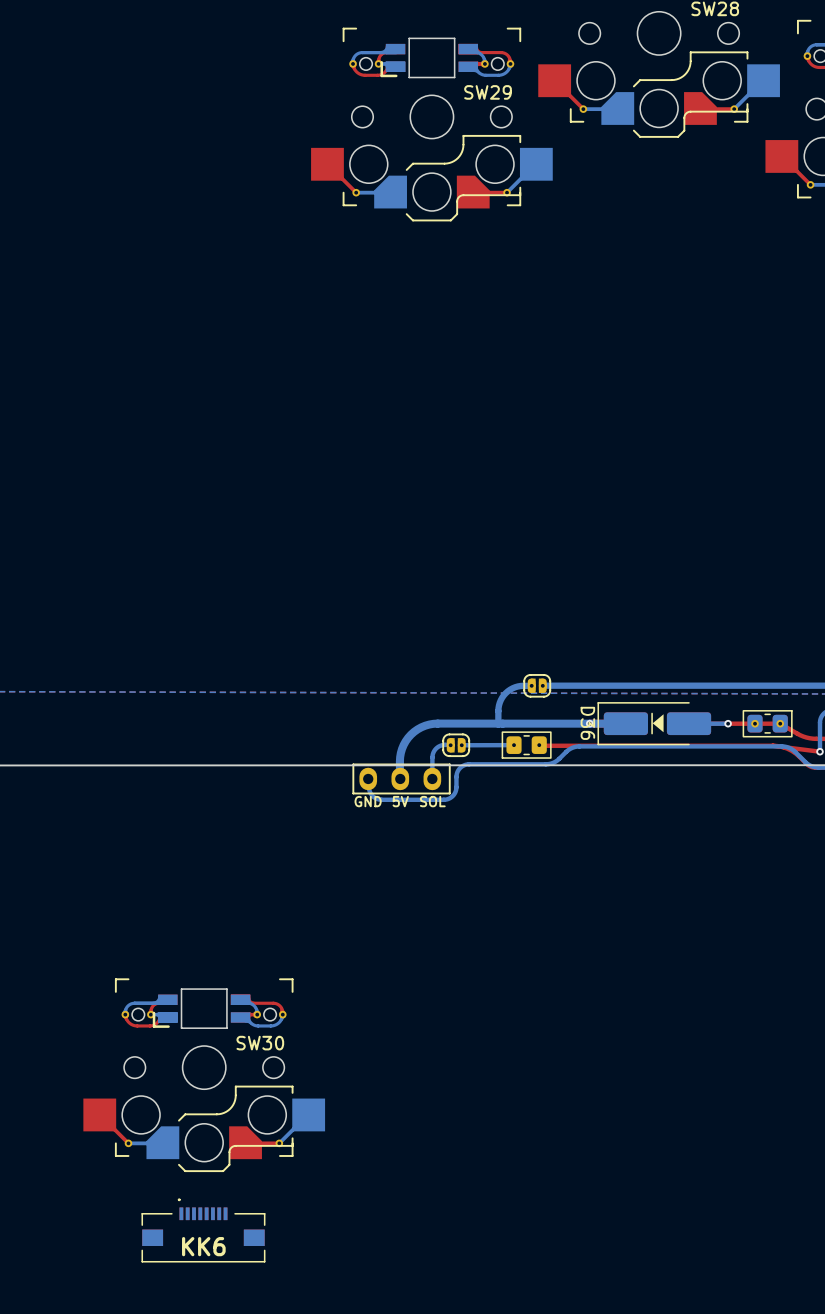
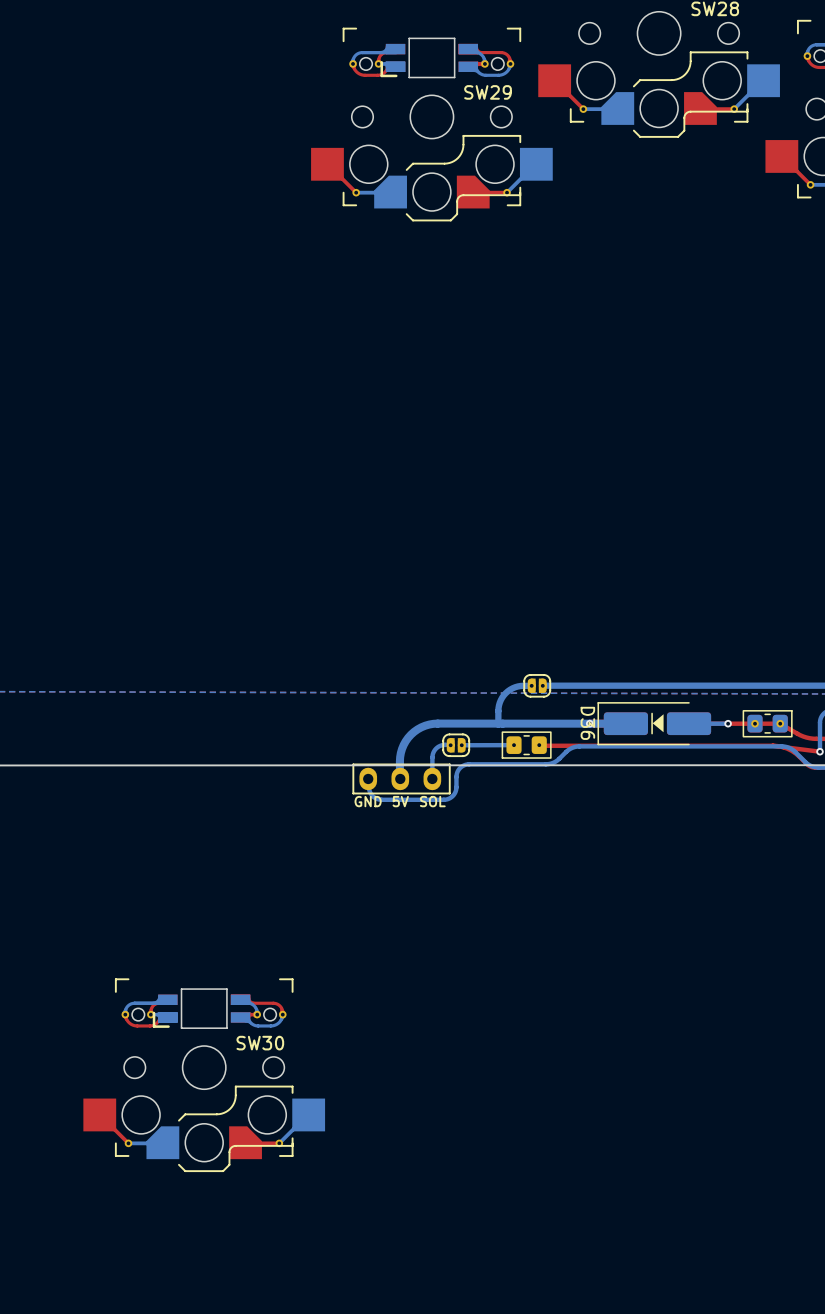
KK6: (203, 1230) -> none

